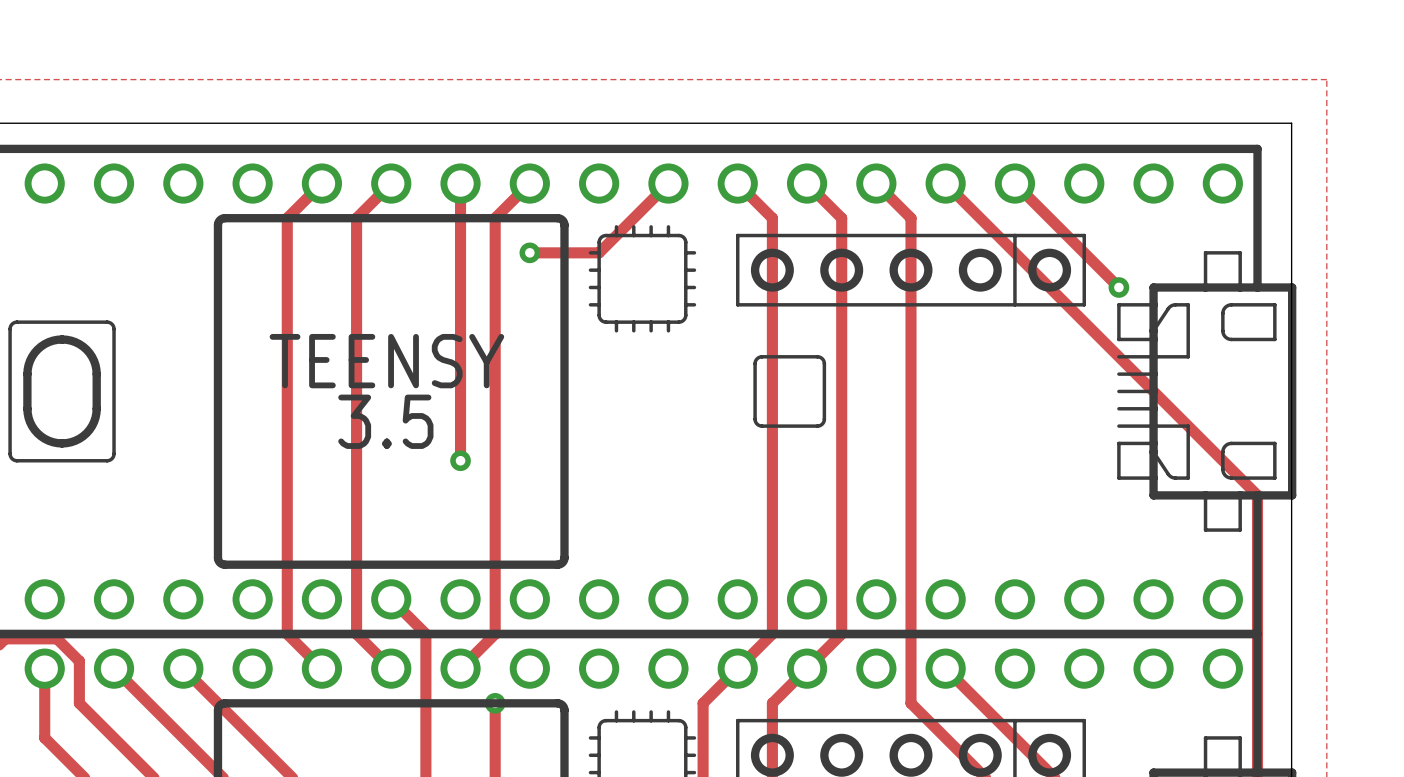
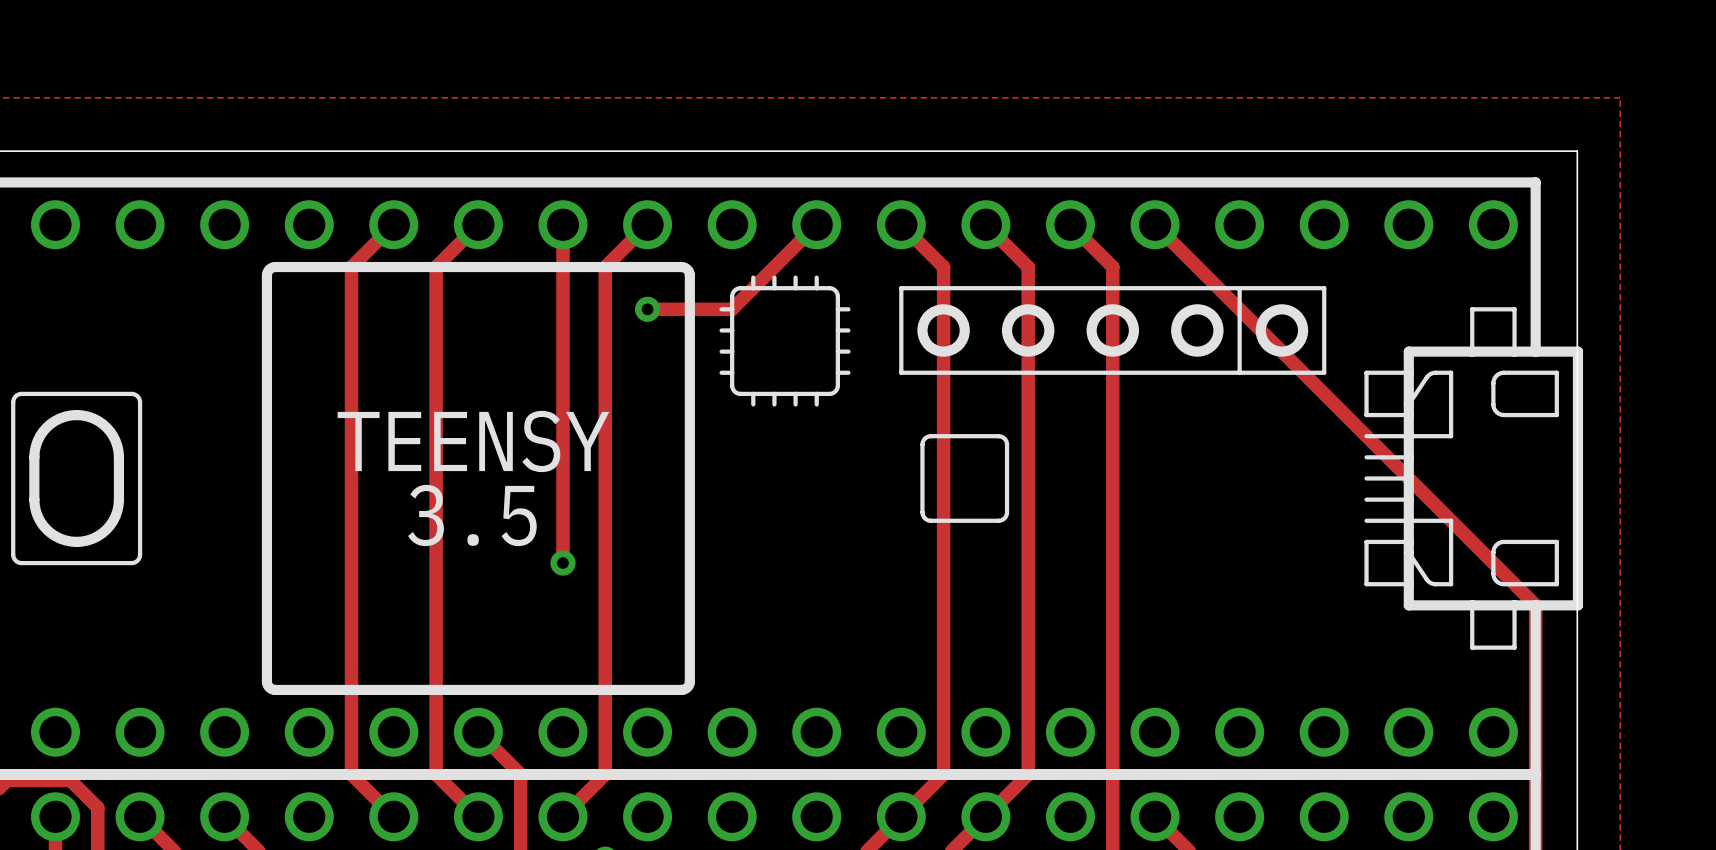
track: (1014, 183) (1118, 287) -> none
via: (1118, 287) -> none

